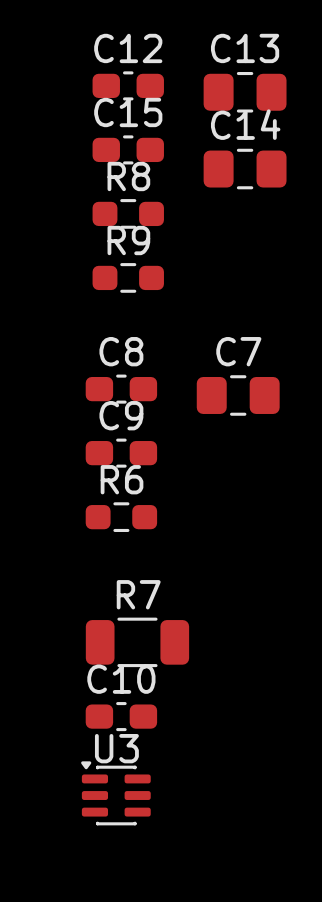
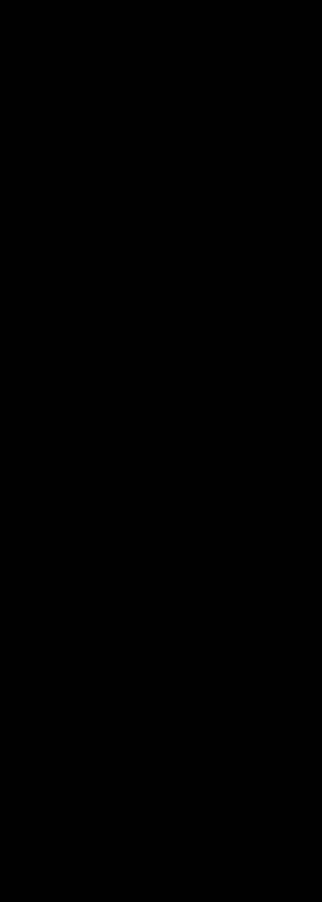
C12: (128, 85) -> none
C13: (245, 92) -> none
C15: (128, 149) -> none
C14: (245, 169) -> none
R8: (128, 213) -> none
R9: (128, 277) -> none
C8: (121, 389) -> none
C7: (238, 395) -> none
C9: (121, 453) -> none
R6: (121, 517) -> none
R7: (137, 642) -> none
C10: (121, 716) -> none
U3: (115, 793) -> none

